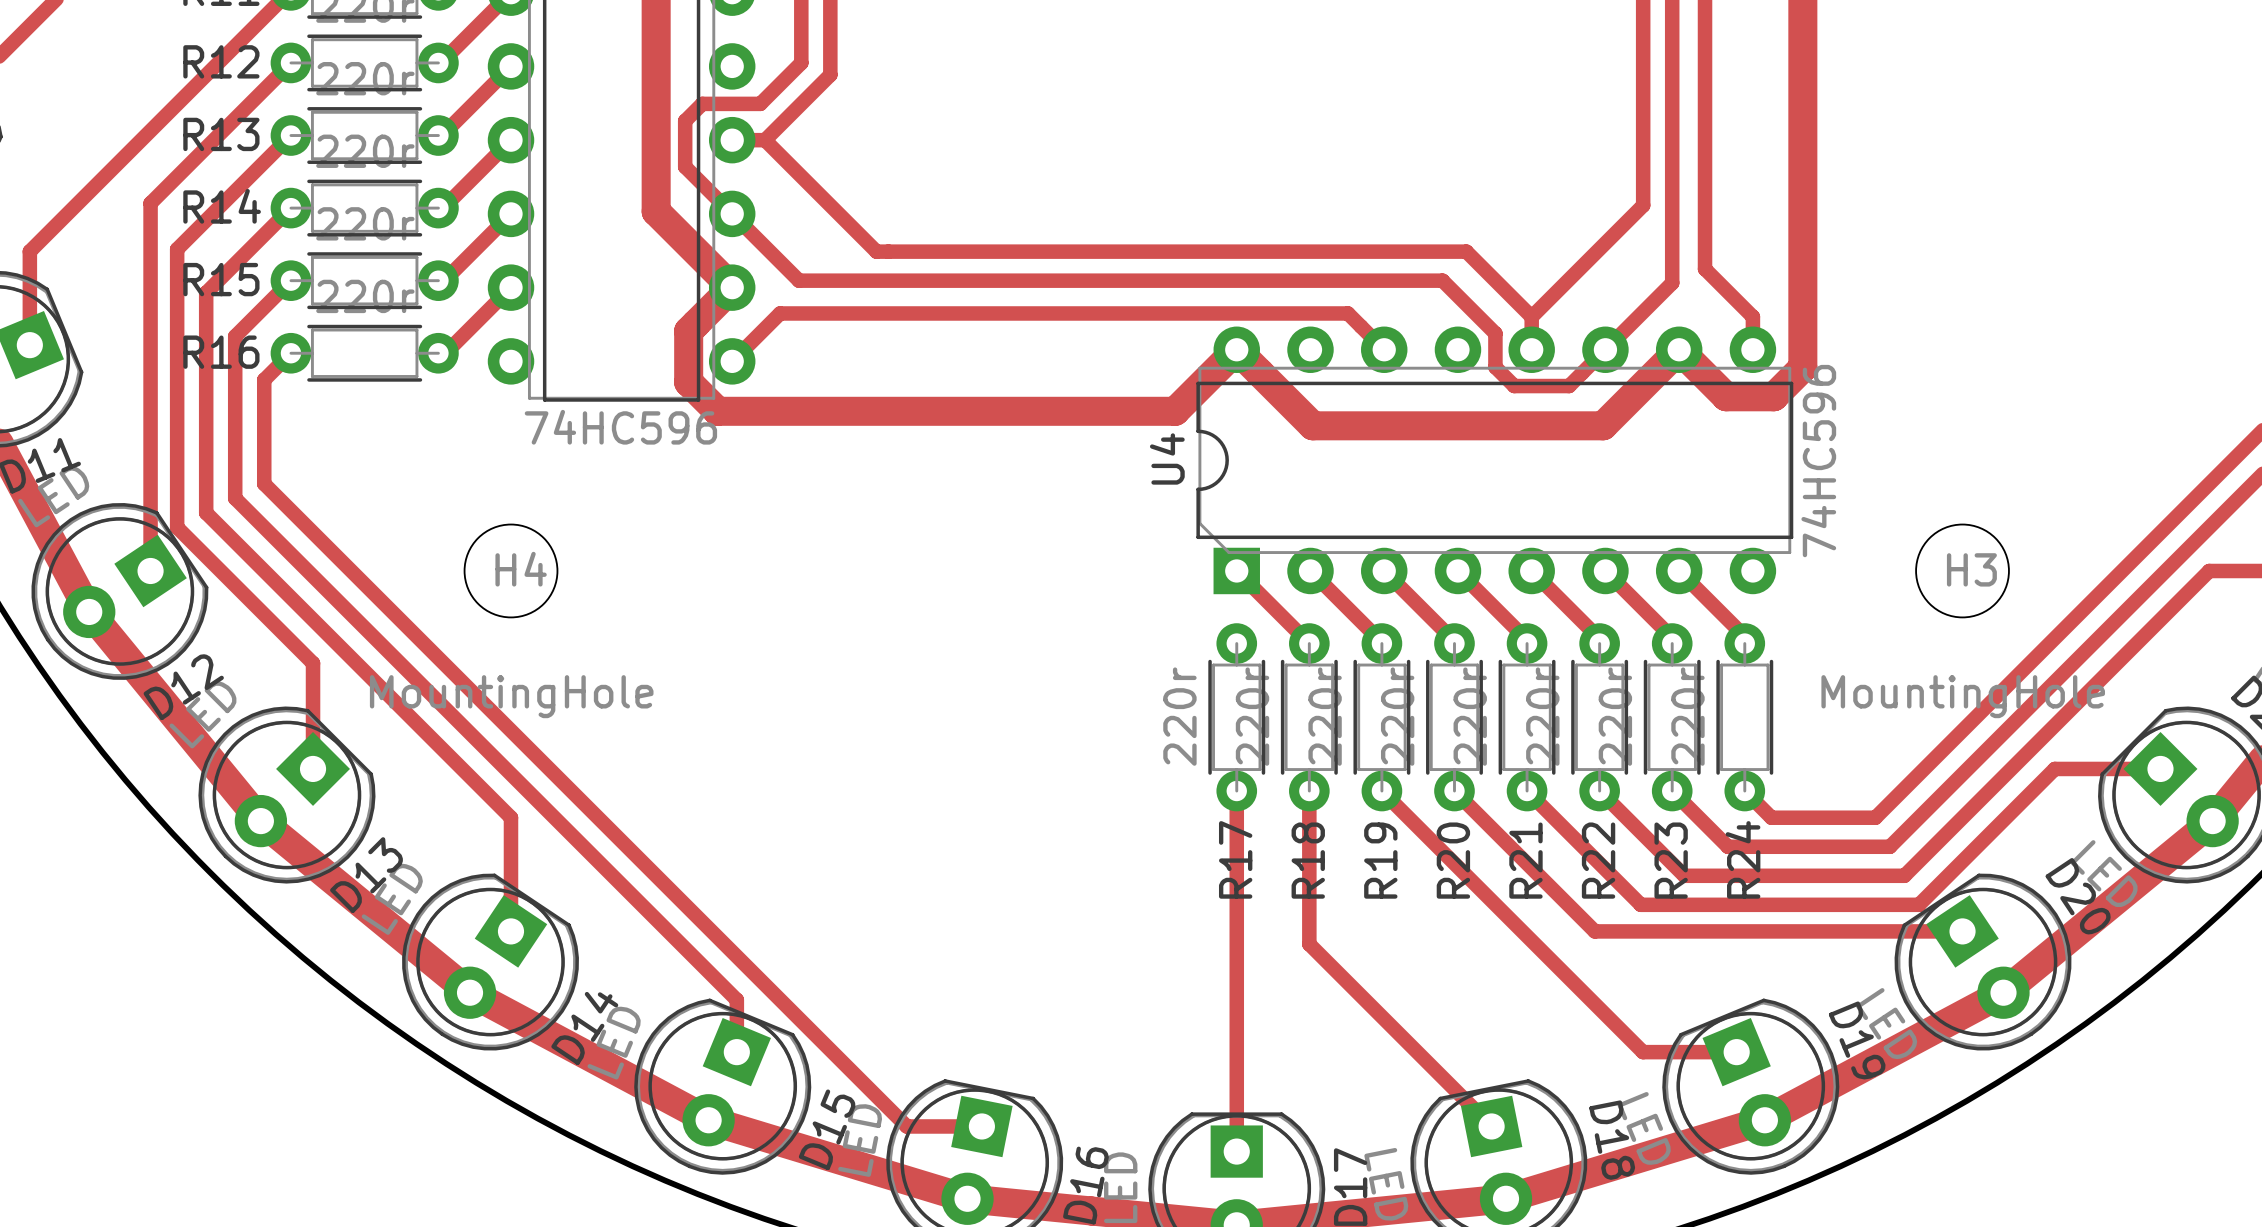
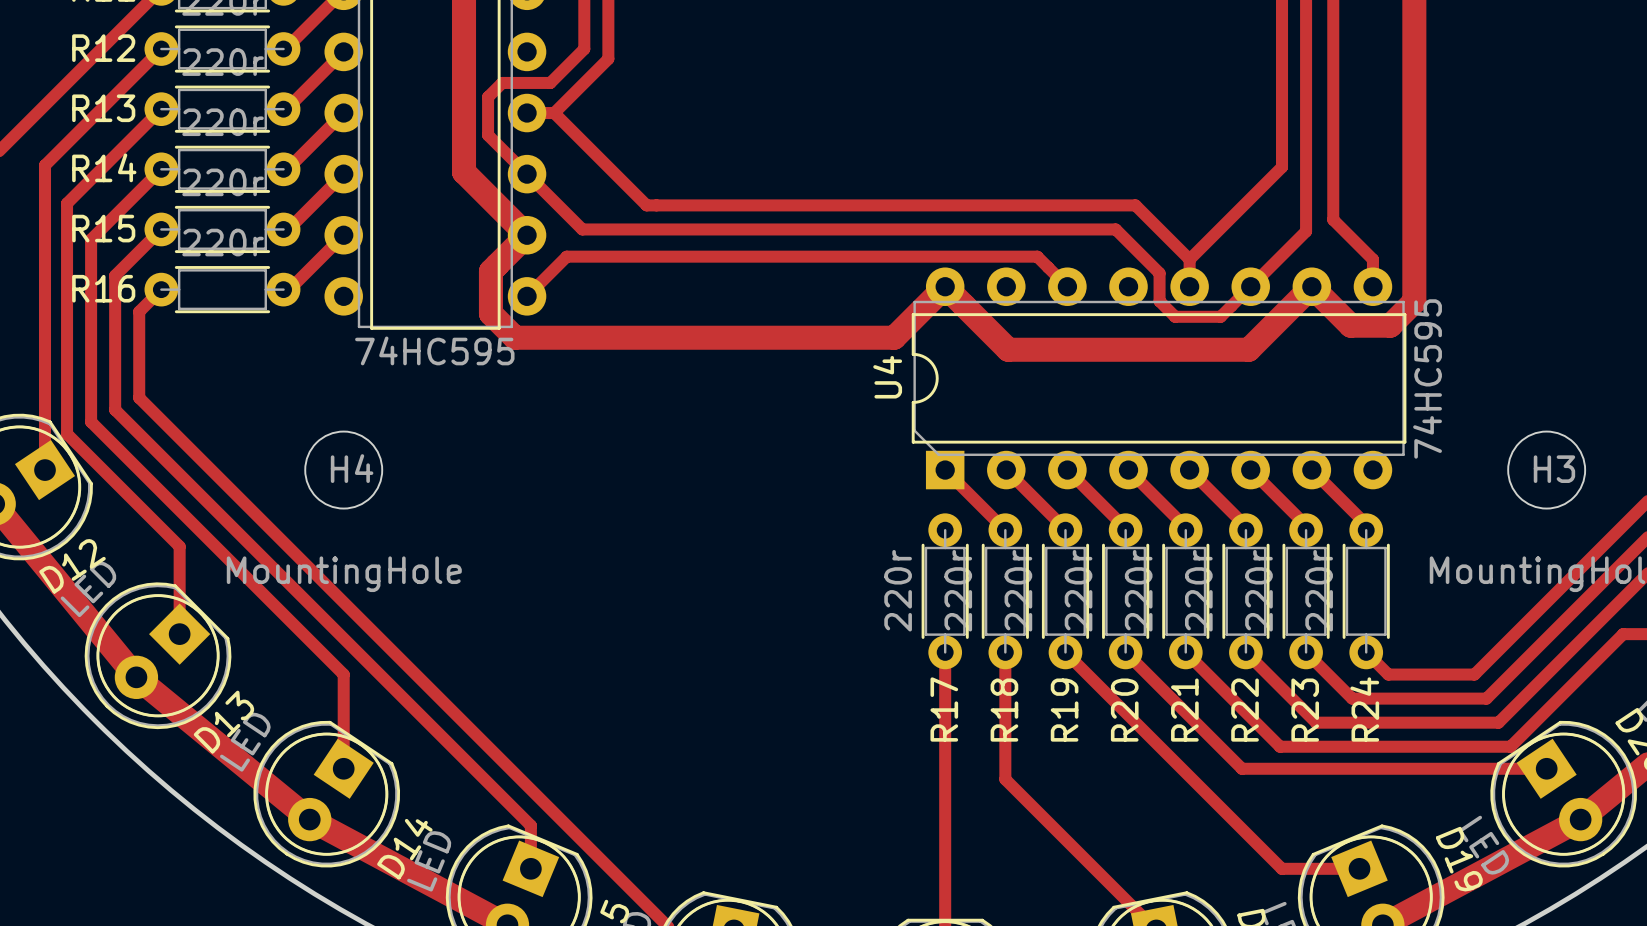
part value: 74HC596 (620, 427) -> 74HC595 (434, 350)
U4 value: 74HC596 (1818, 461) -> 74HC595 (1427, 378)

